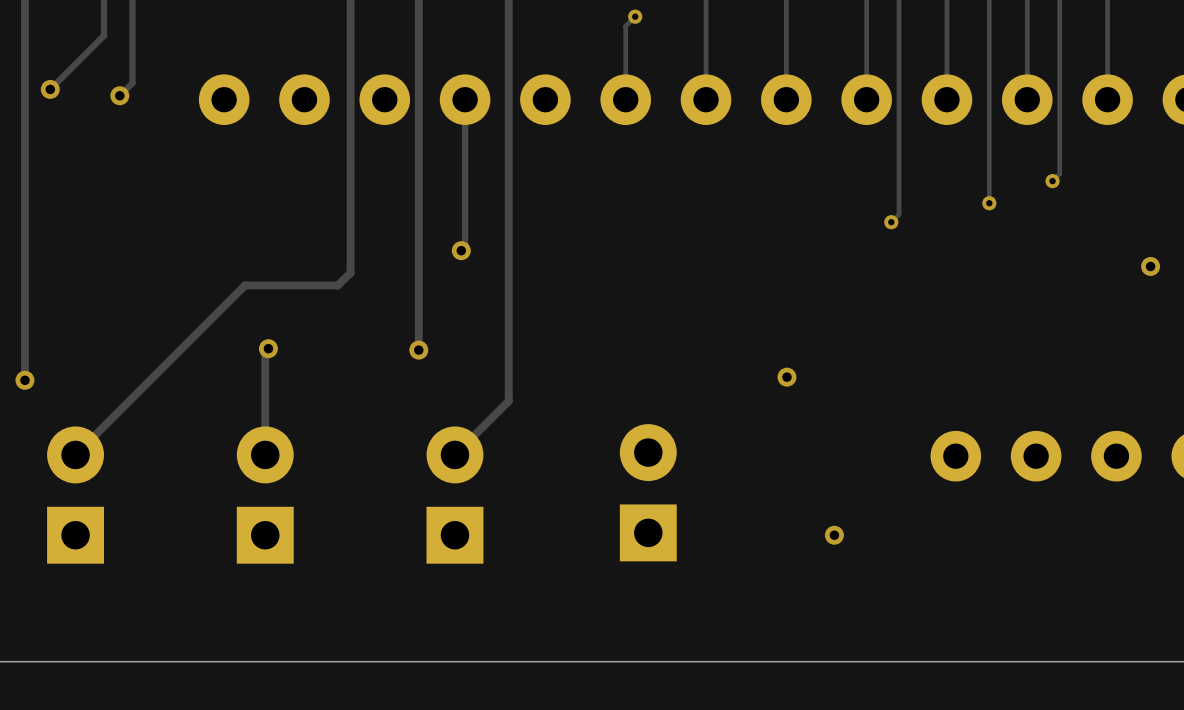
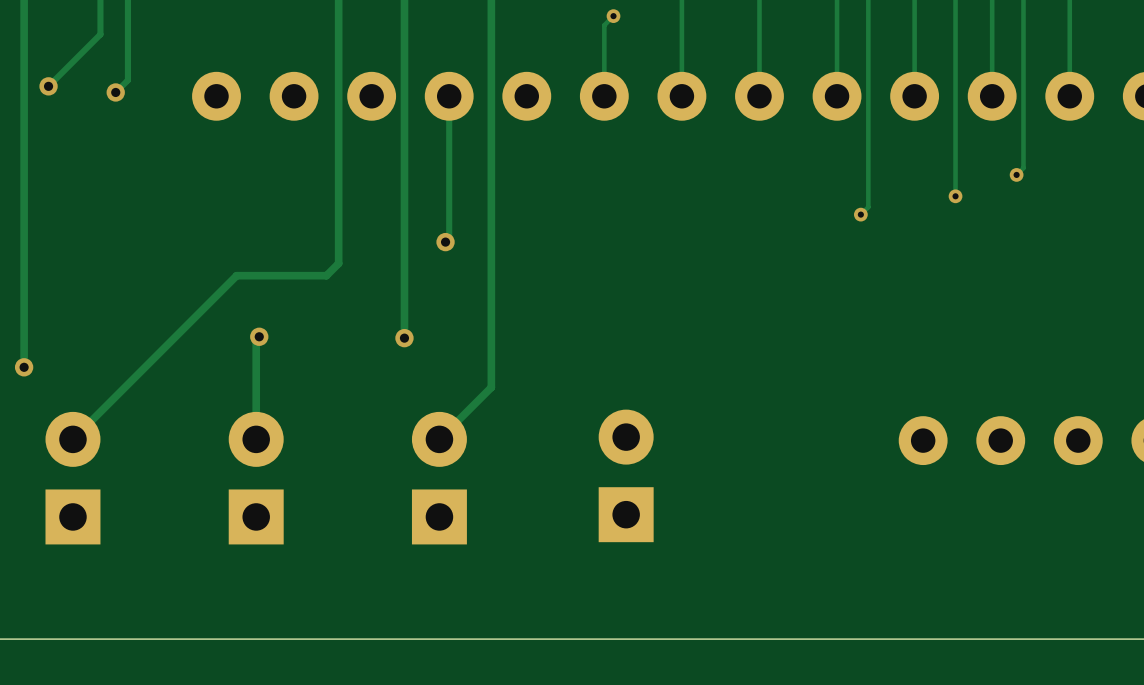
via: (1150, 266) -> none
via: (786, 377) -> none
via: (834, 535) -> none

